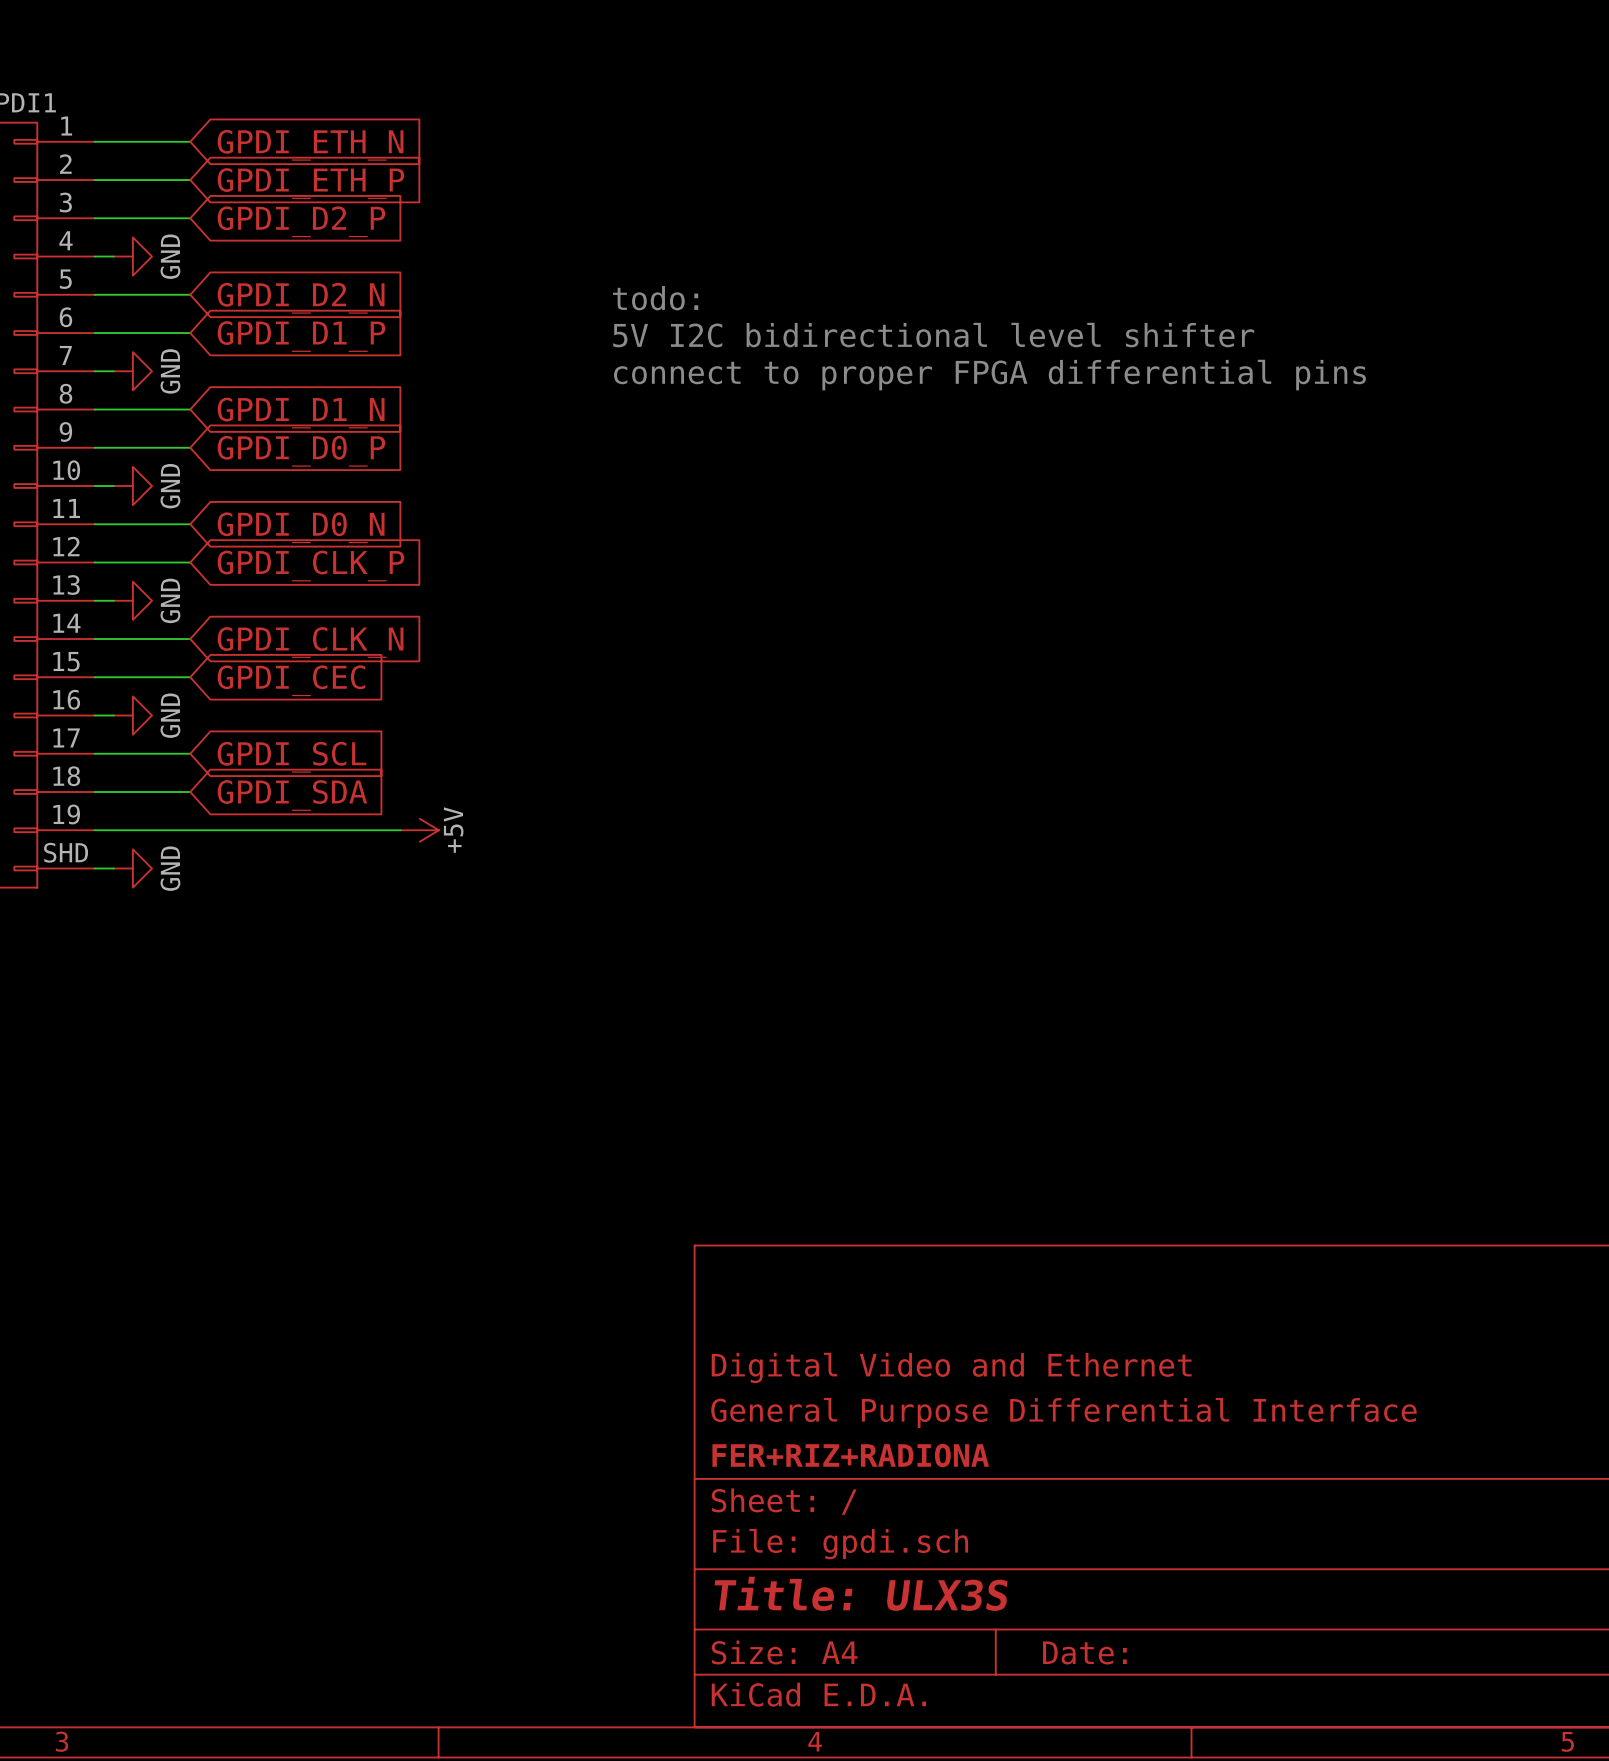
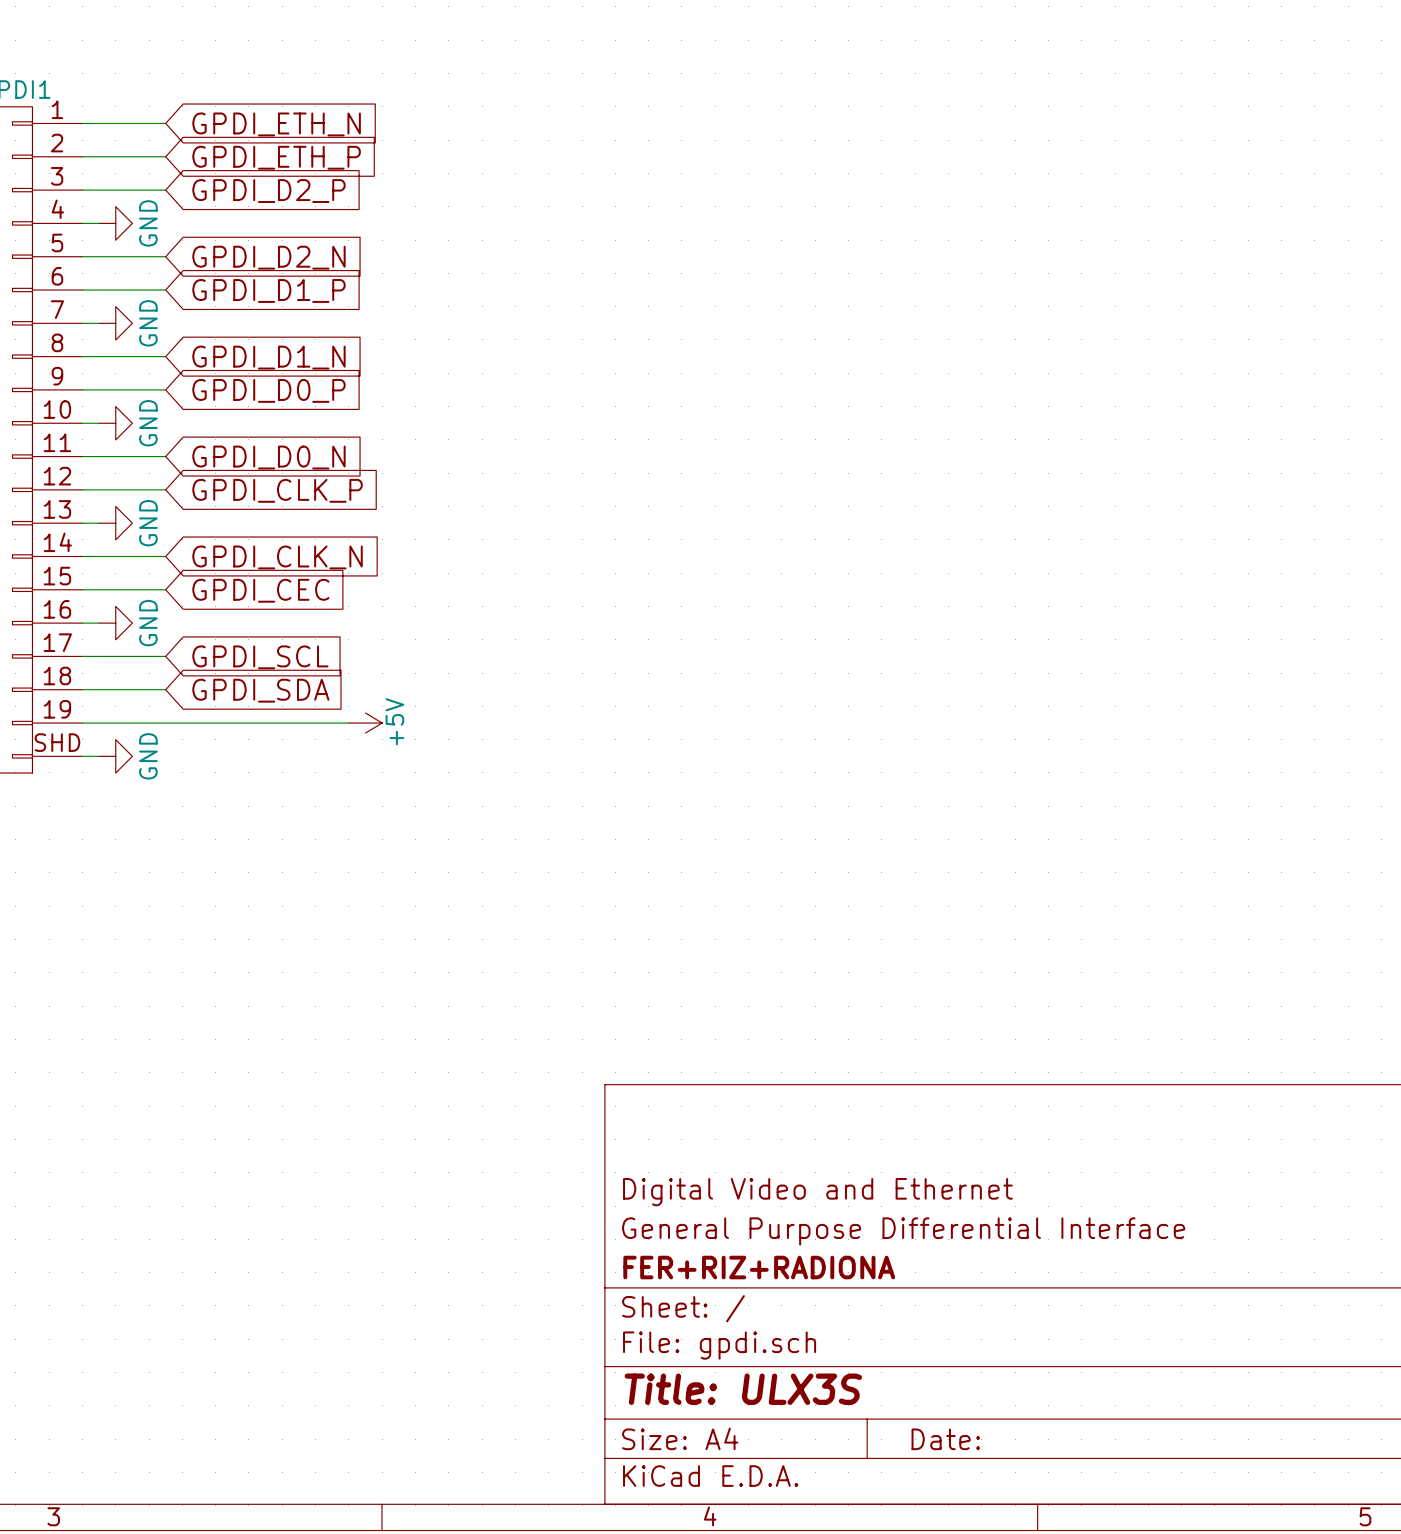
text: todo: (655, 298) -> none
text: 5V I2C bidirectional level shifter (933, 335) -> none
text: connect to proper FPGA differential pins (989, 375) -> none

